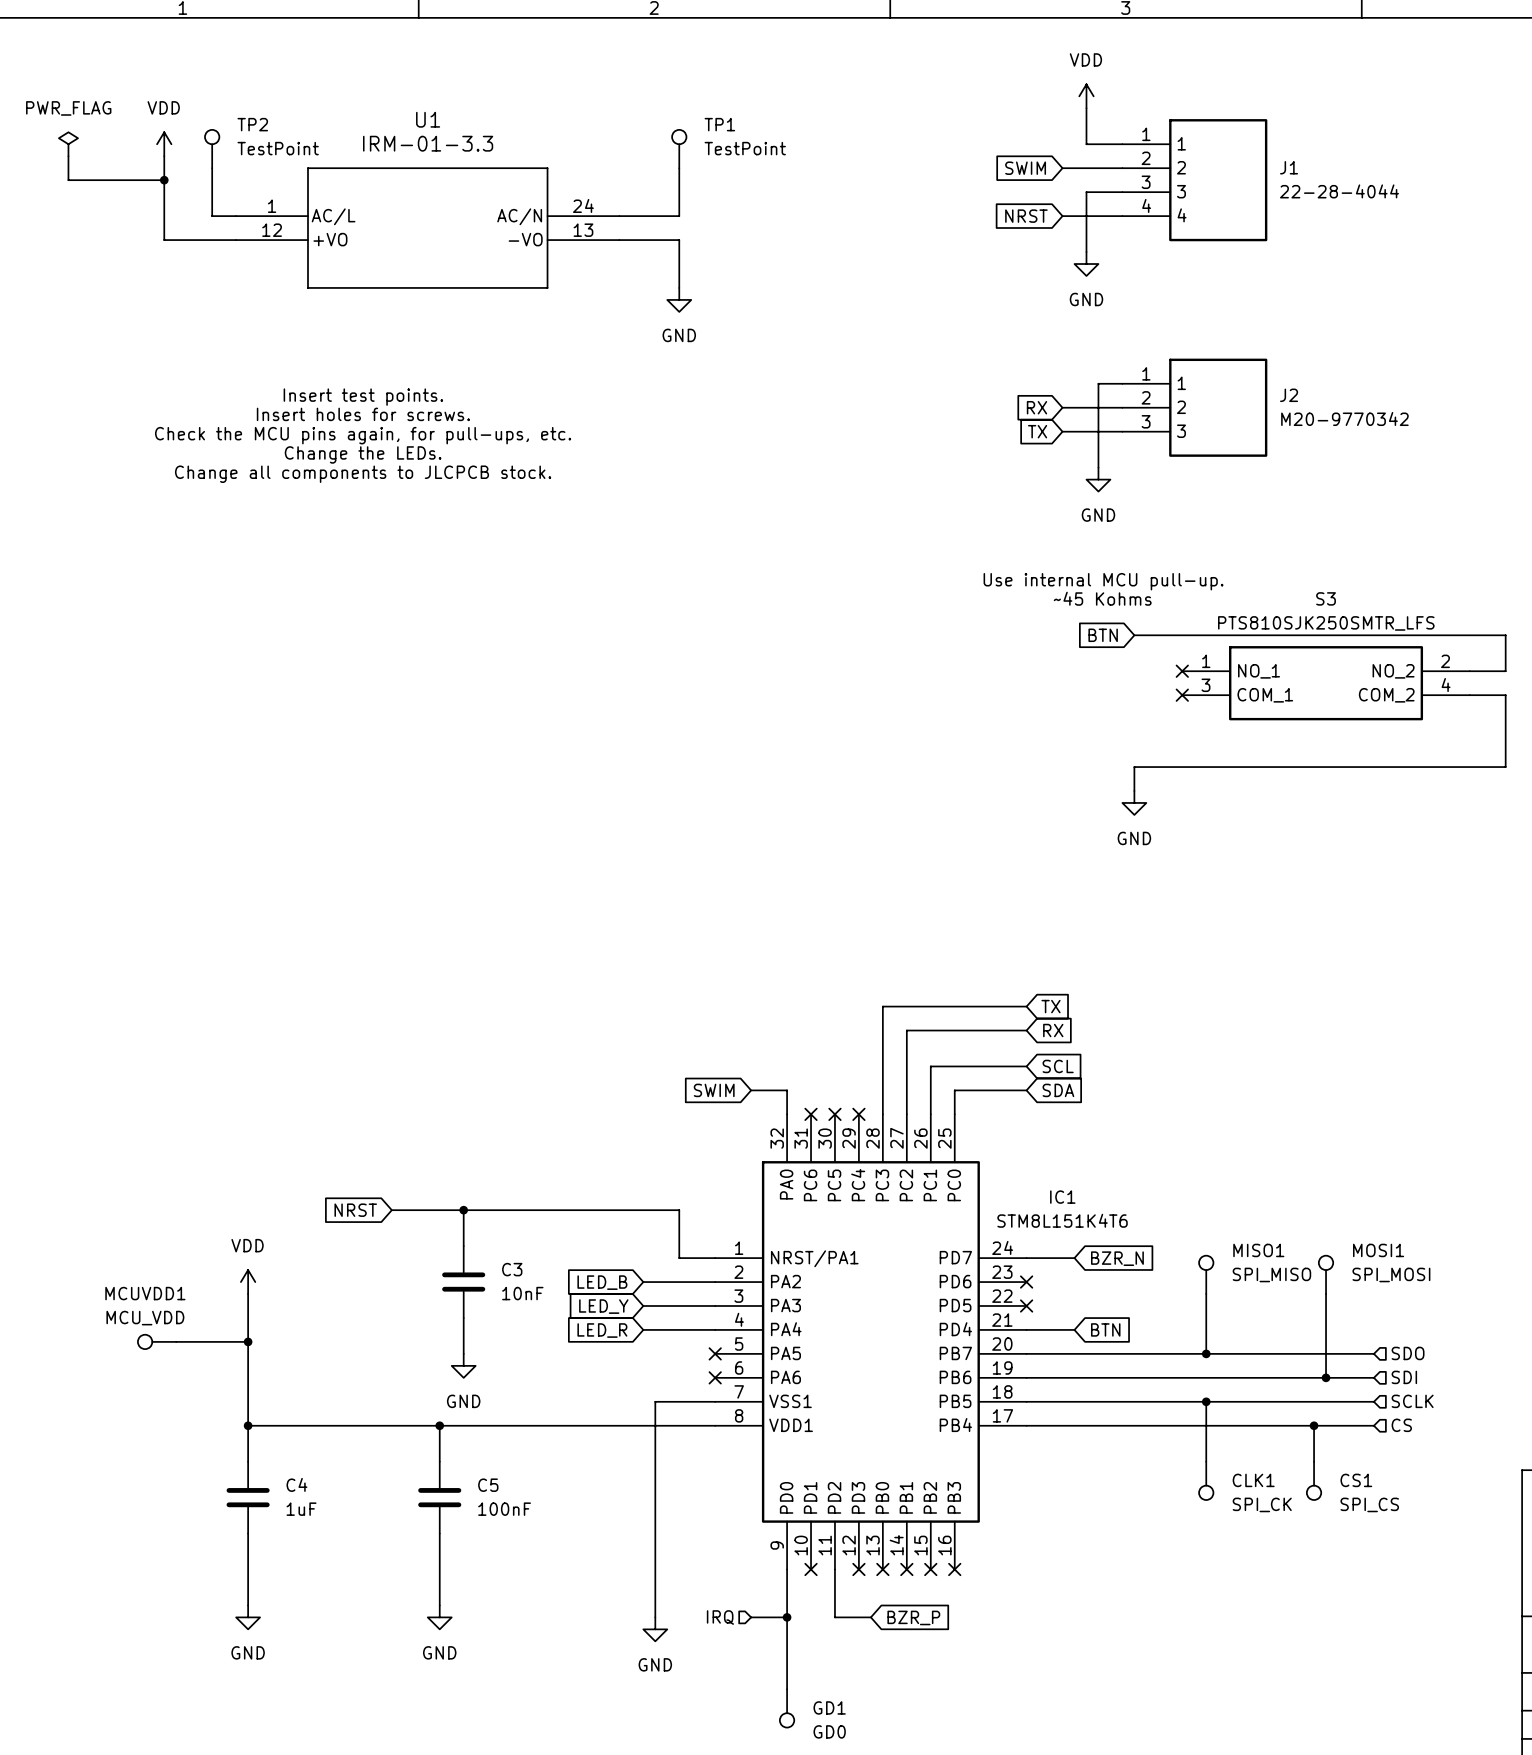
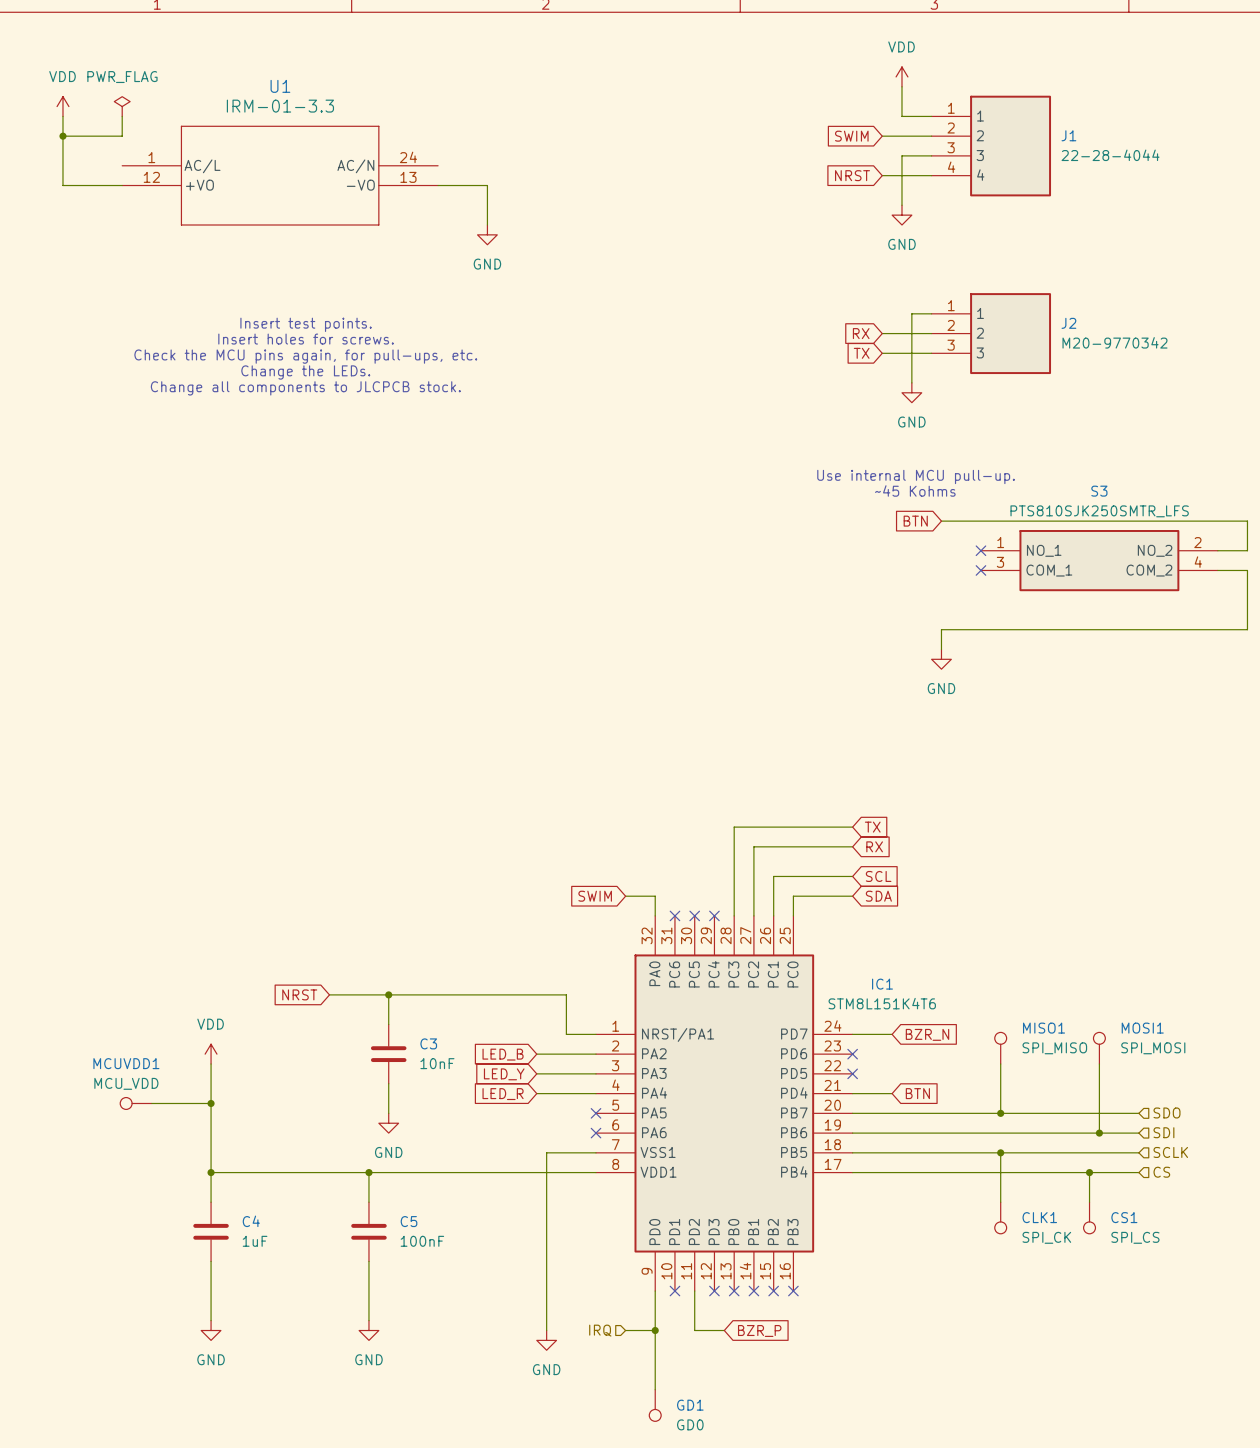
power symbol position: PWR_FLAG (68, 144) -> PWR_FLAG (122, 106)
wire: none -> (122, 116) (122, 136) (62, 136)
power symbol position: VDD (164, 144) -> VDD (62, 106)
TP2: TestPoint (212, 149) -> none
TP1: TestPoint (679, 149) -> none
wire: (164, 156) (164, 240) (236, 240) -> none
junction: none -> (62, 136)
wire: (212, 168) (212, 216) (236, 216) -> none
wire: (679, 168) (679, 216) (619, 216) -> none
wire: (68, 180) (164, 180) -> (62, 146) (62, 185) (122, 185)
junction: (164, 180) -> none
U1 position: (427, 228) -> (280, 175)
wire: (619, 240) (679, 240) (679, 287) -> (438, 185) (487, 185) (487, 225)
power symbol position: GND (679, 299) -> GND (487, 234)

